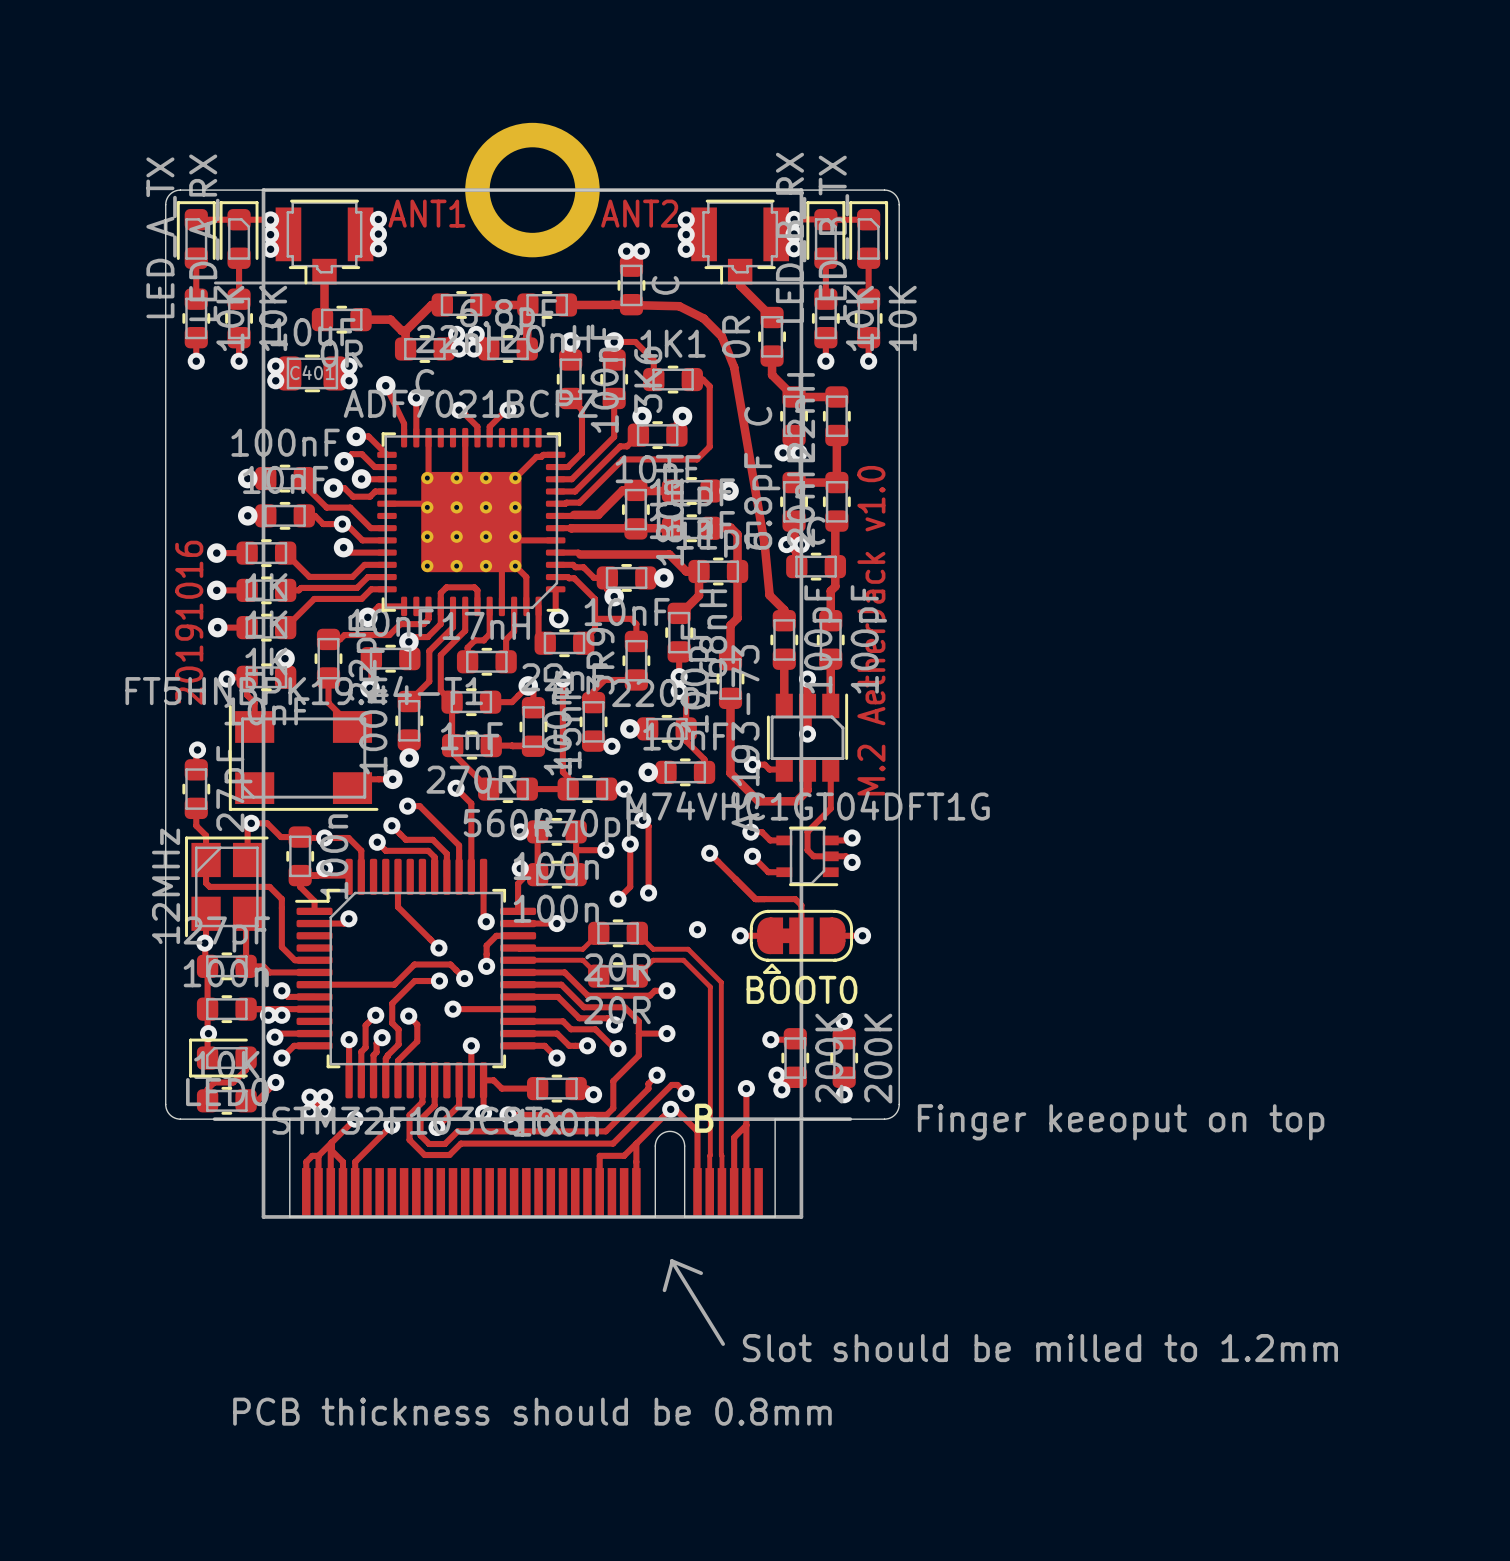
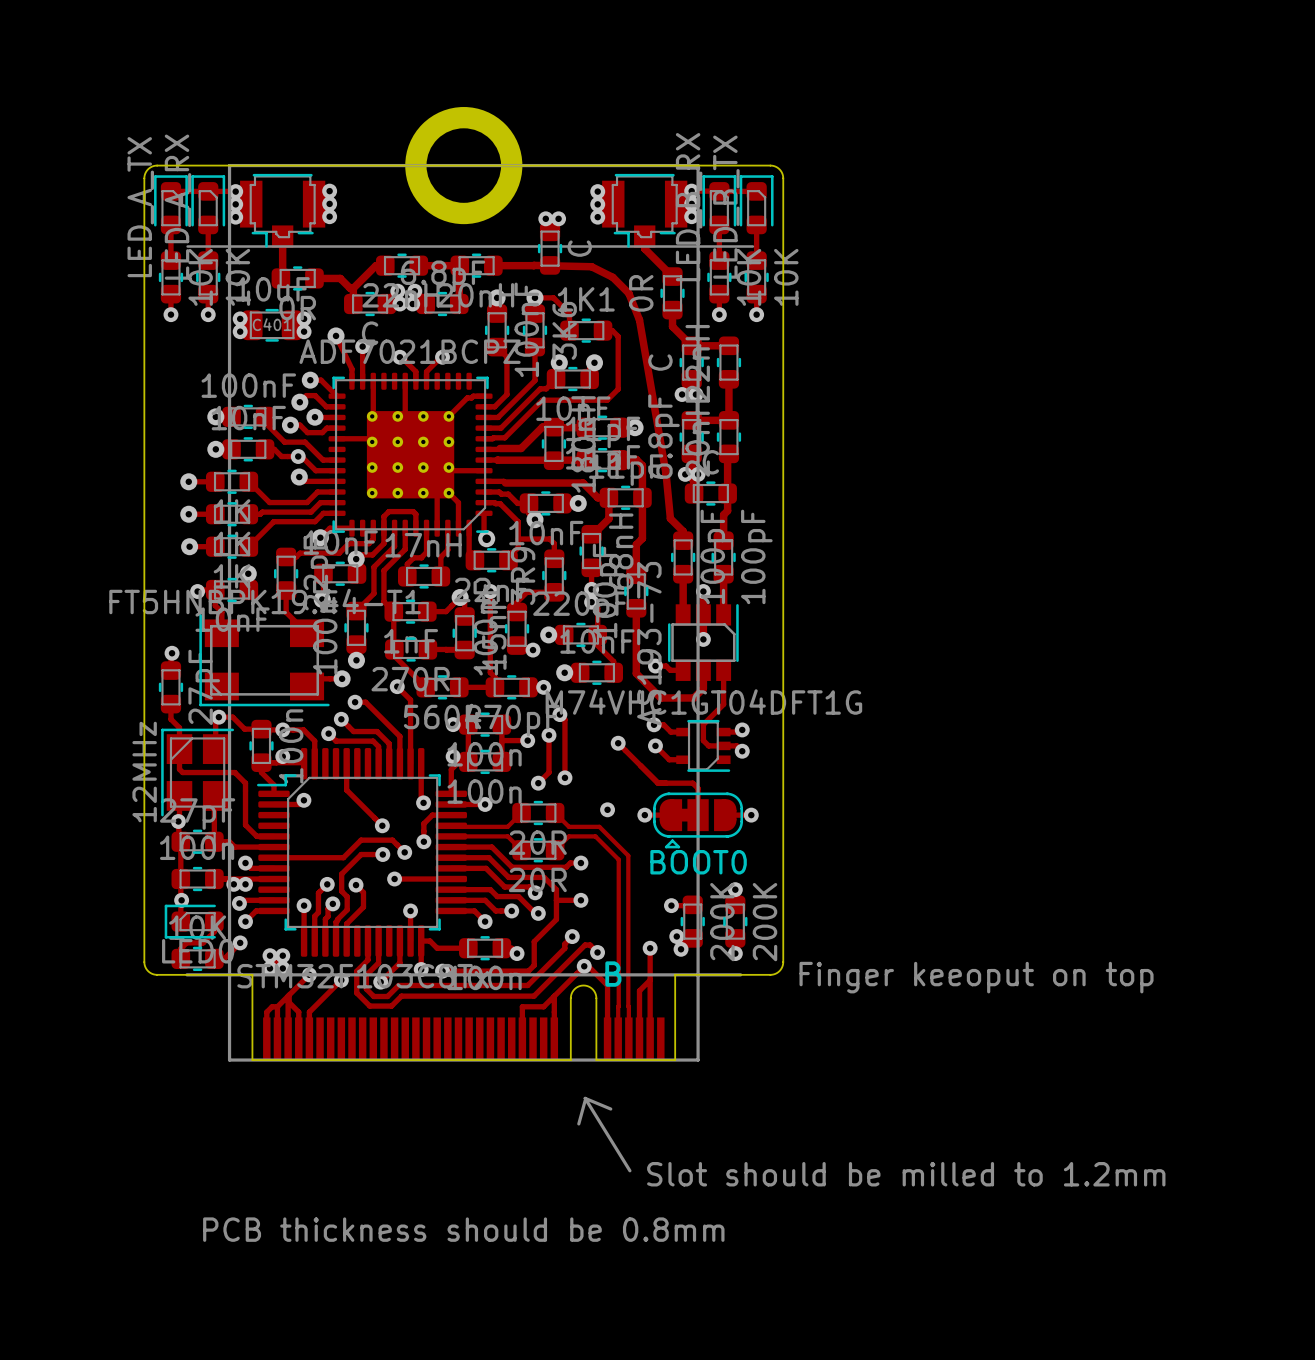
text: ANT1 (426, 213) -> none
text: ANT2 (639, 213) -> none
text: 20191016 (189, 622) -> none
text: M.2 AetherJack v1.0 (871, 630) -> none

